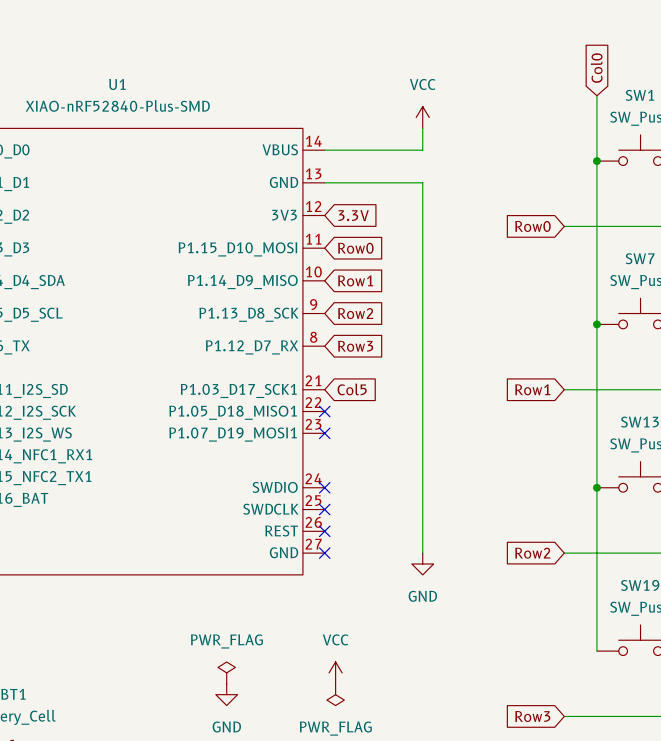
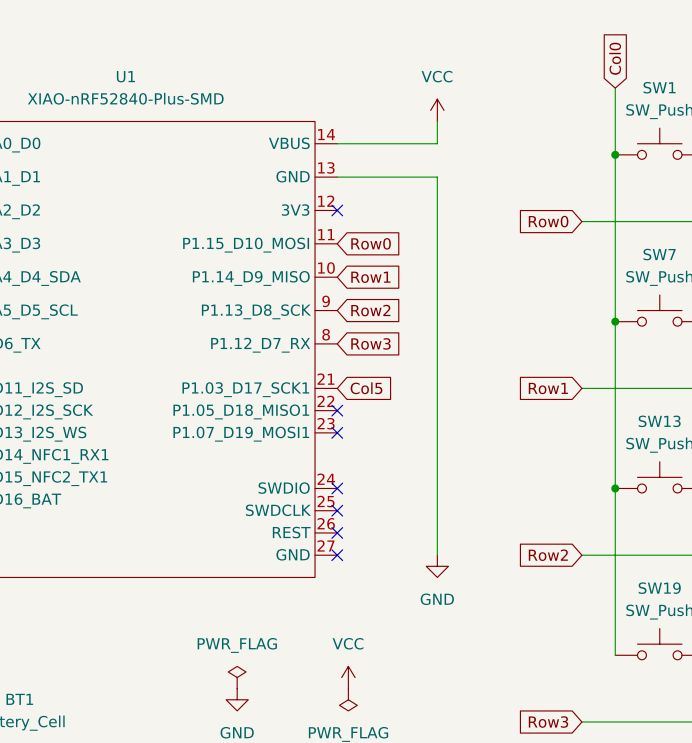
no-connect mark: none -> (337, 210)
global label: 3.3V (353, 215) -> none

